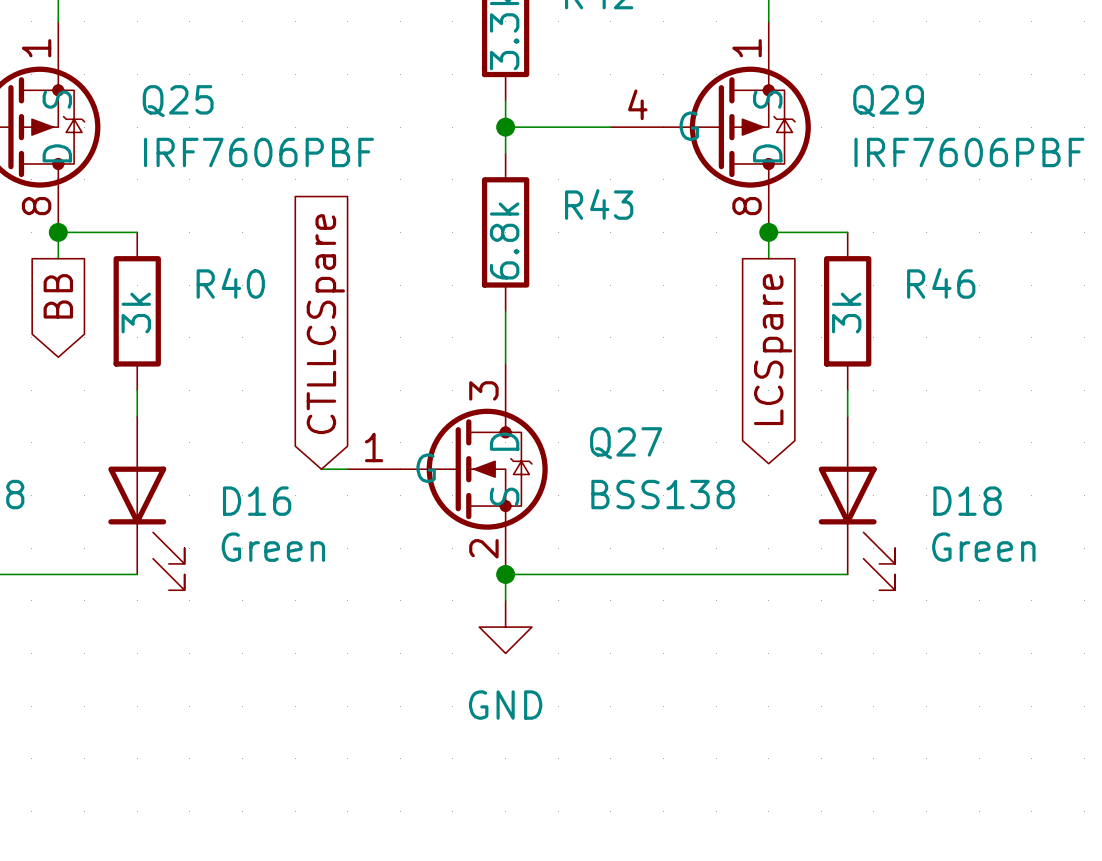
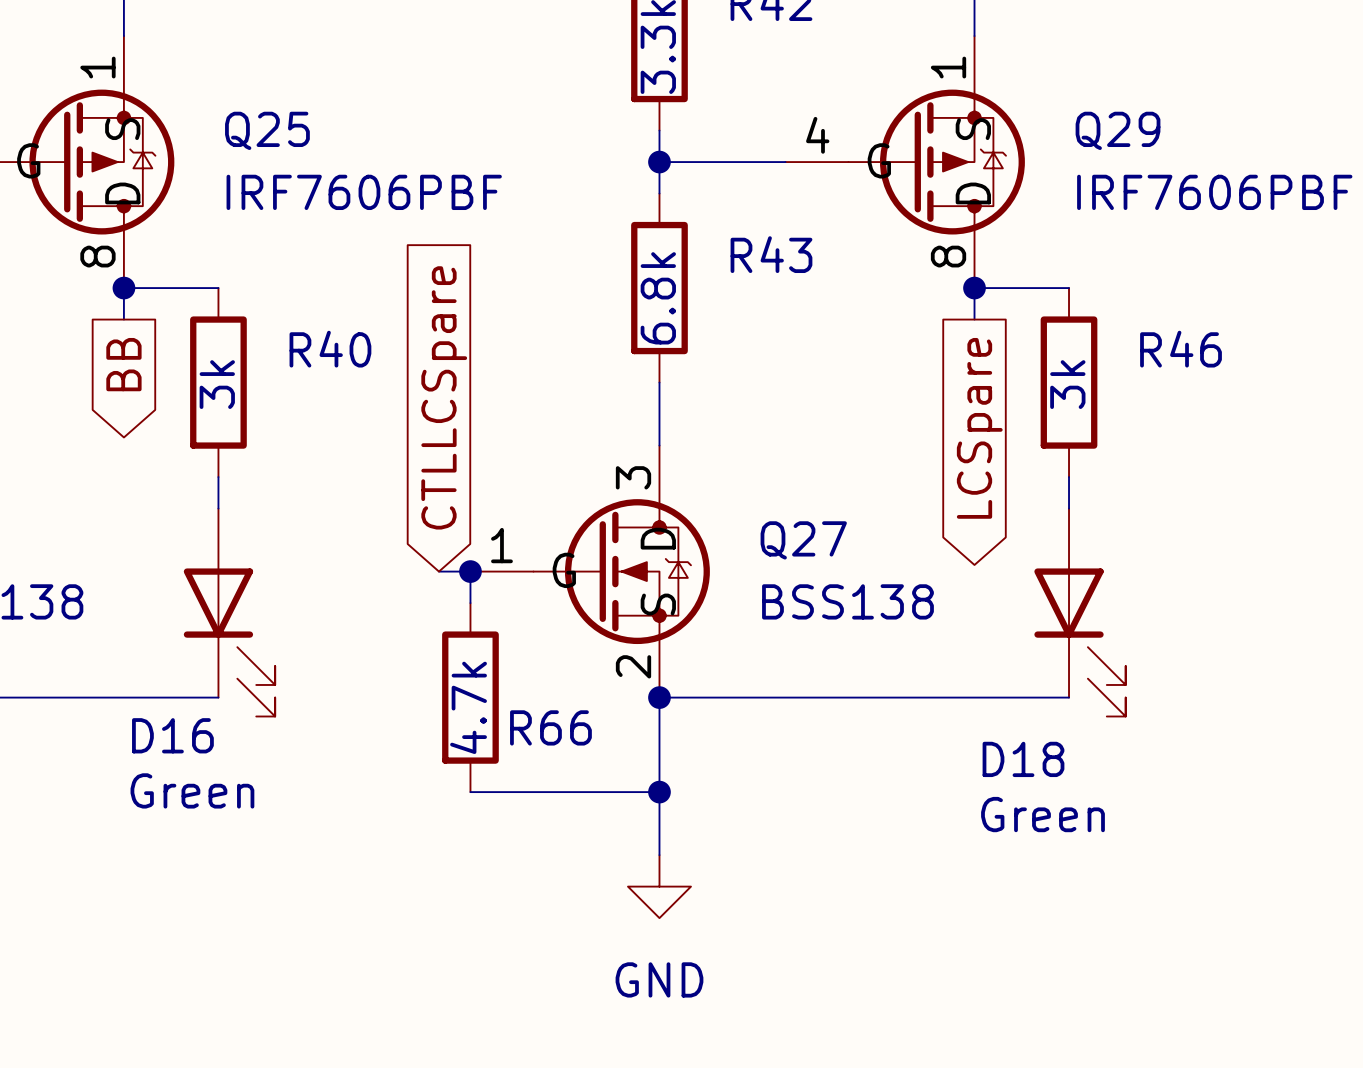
wire: none -> (470, 571) (470, 603)
junction: none -> (470, 571)
D16 name position: D16 (257, 501) -> D16 (172, 735)
D18 name position: D18 (967, 501) -> D18 (1023, 759)
D16 value position: Green (273, 547) -> Green (192, 790)
D18 value position: Green (983, 547) -> Green (1042, 814)
R66: none -> 4.7k (470, 697)
wire: none -> (659, 729) (659, 855)
power symbol position: GND (505, 627) -> GND (659, 886)
wire: none -> (470, 792) (659, 792)
junction: none -> (659, 792)

